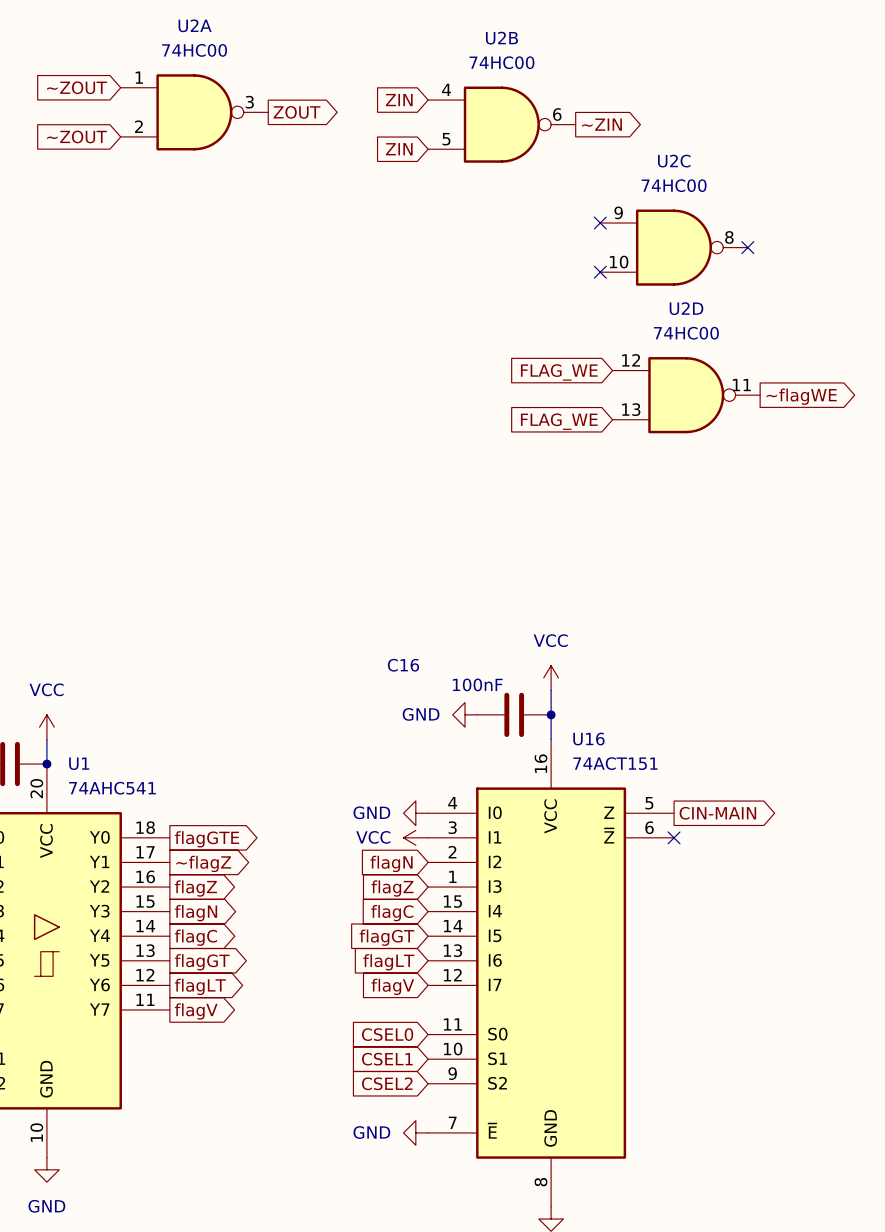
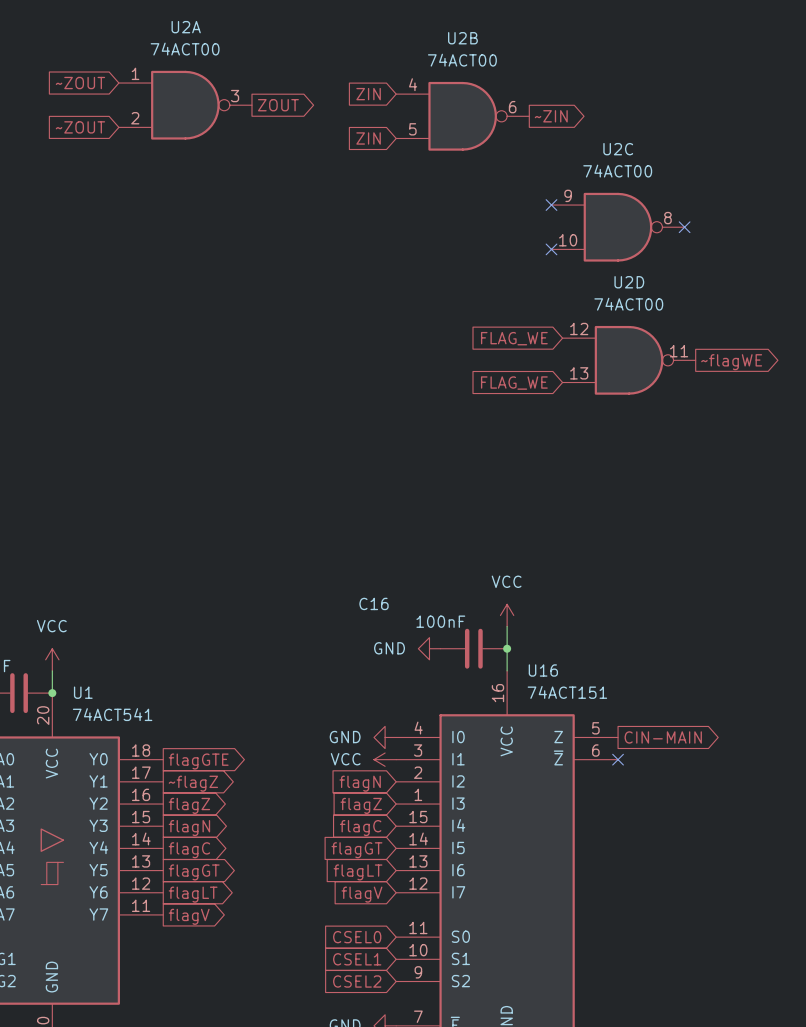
U2A value: 74HC00 (194, 50) -> 74ACT00 (185, 49)
U2B value: 74HC00 (501, 62) -> 74ACT00 (462, 60)
U2C value: 74HC00 (674, 185) -> 74ACT00 (617, 171)
U2D value: 74HC00 (686, 333) -> 74ACT00 (628, 304)
U1 value: 74AHC541 (112, 788) -> 74ACT541 (112, 714)

